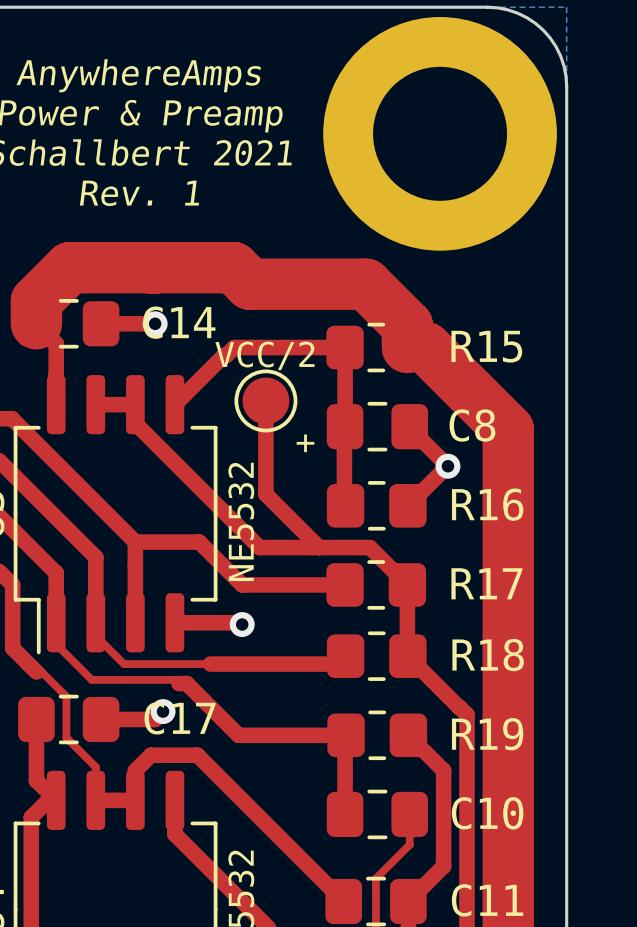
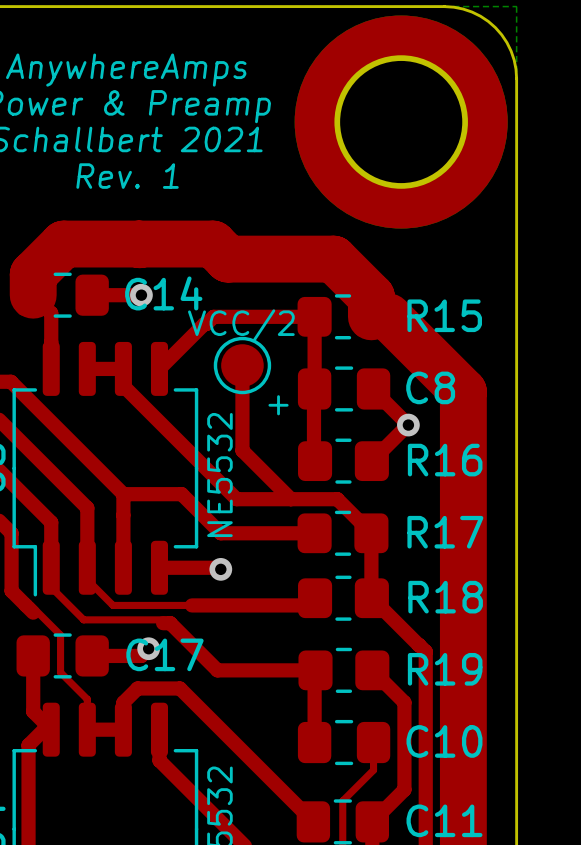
part footprint: [323, 17, 557, 251] -> [294, 15, 508, 229]

